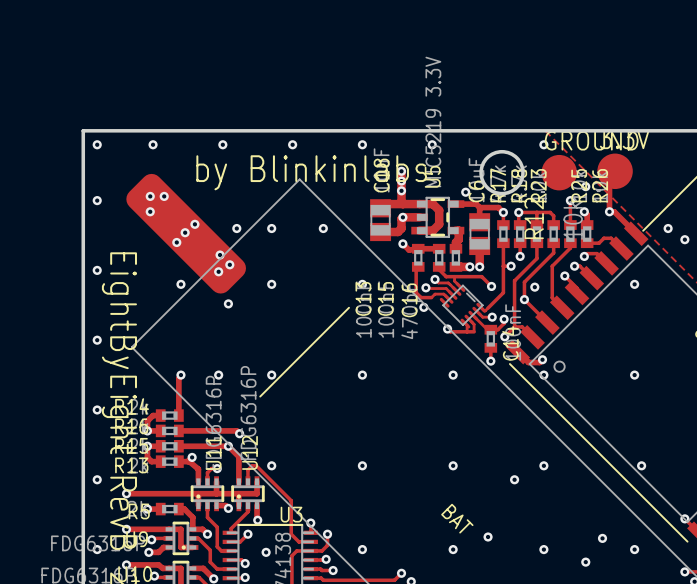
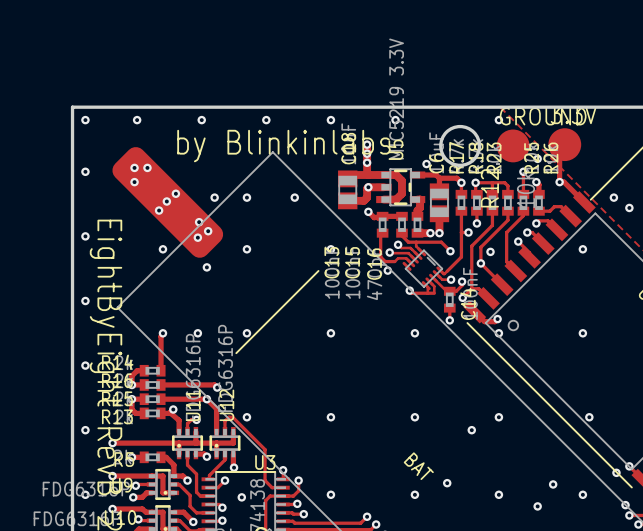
via: none -> (616, 472)
via: none -> (625, 505)

